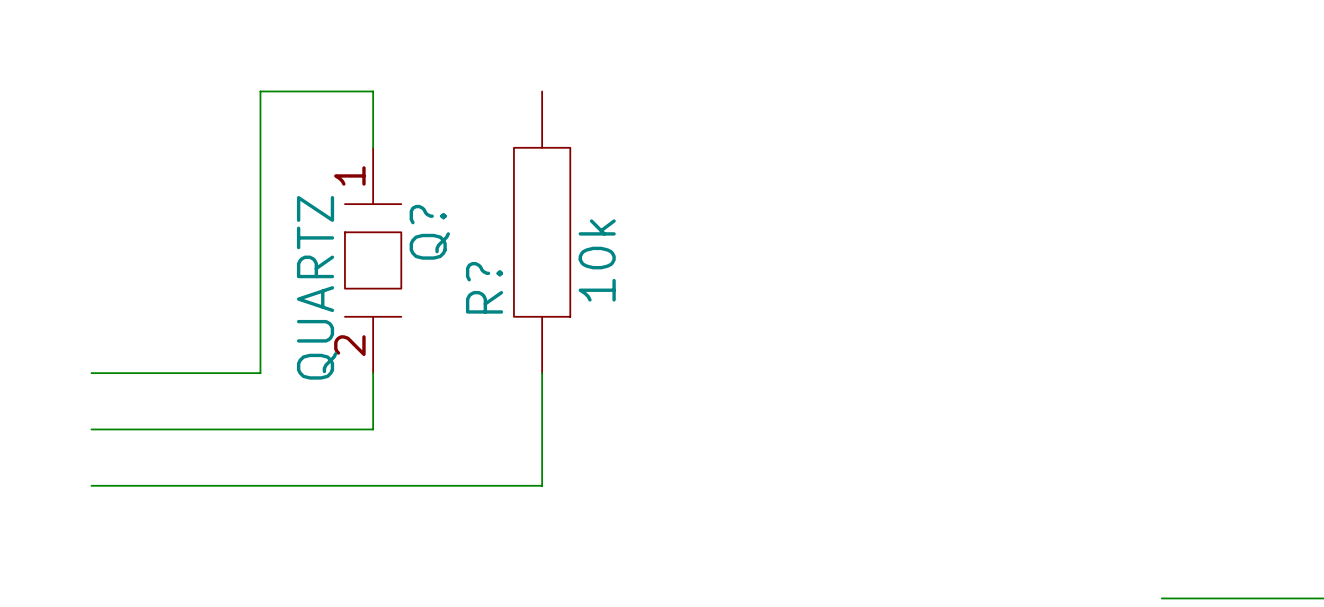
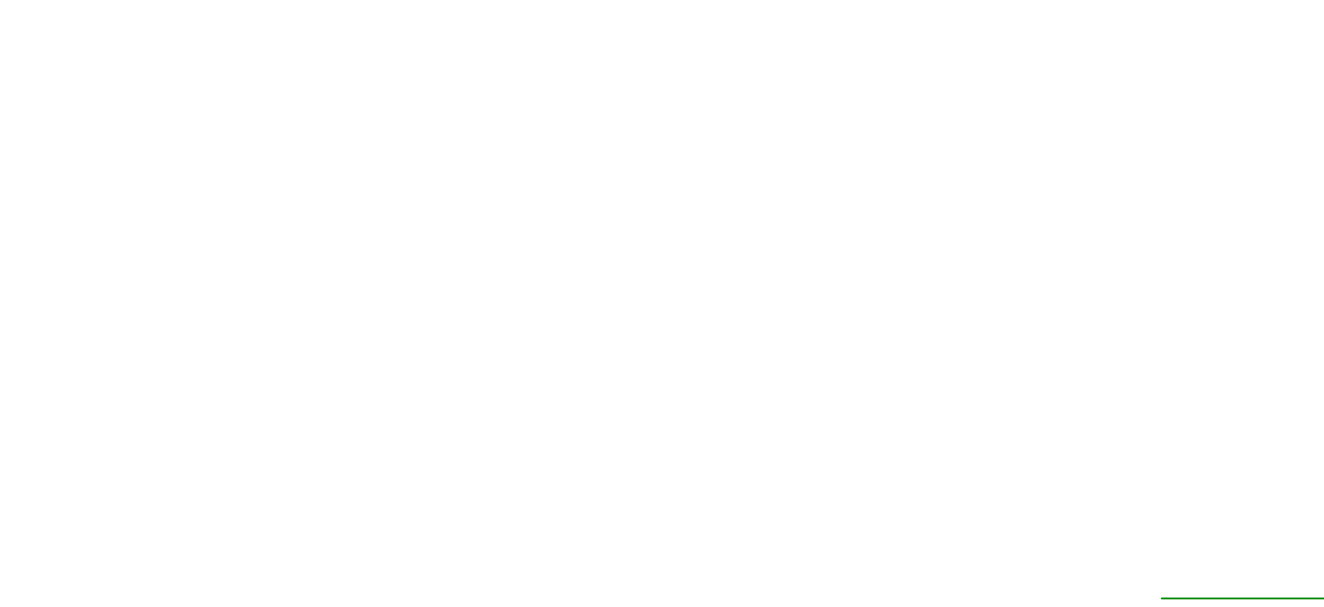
wire: (373, 147) (373, 91) (260, 91) (260, 373) (91, 373) -> none
R?: 10k (542, 232) -> none
Q?: QUARTZ (373, 260) -> none
wire: (373, 373) (373, 429) (91, 429) -> none
wire: (542, 373) (542, 485) (91, 485) -> none

